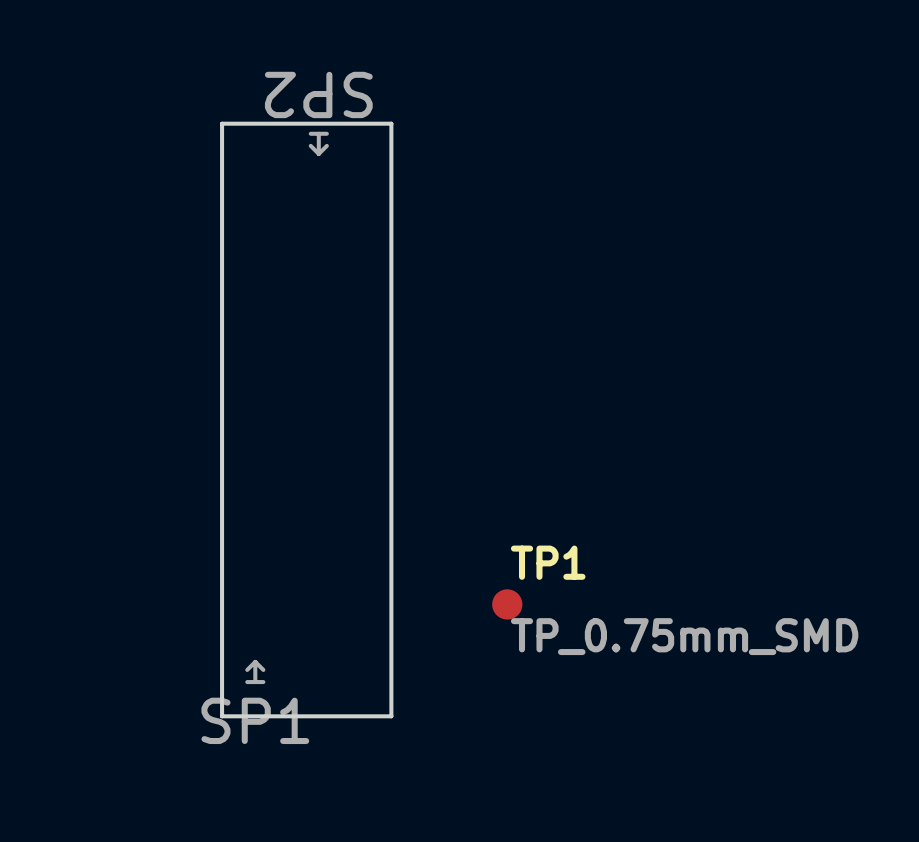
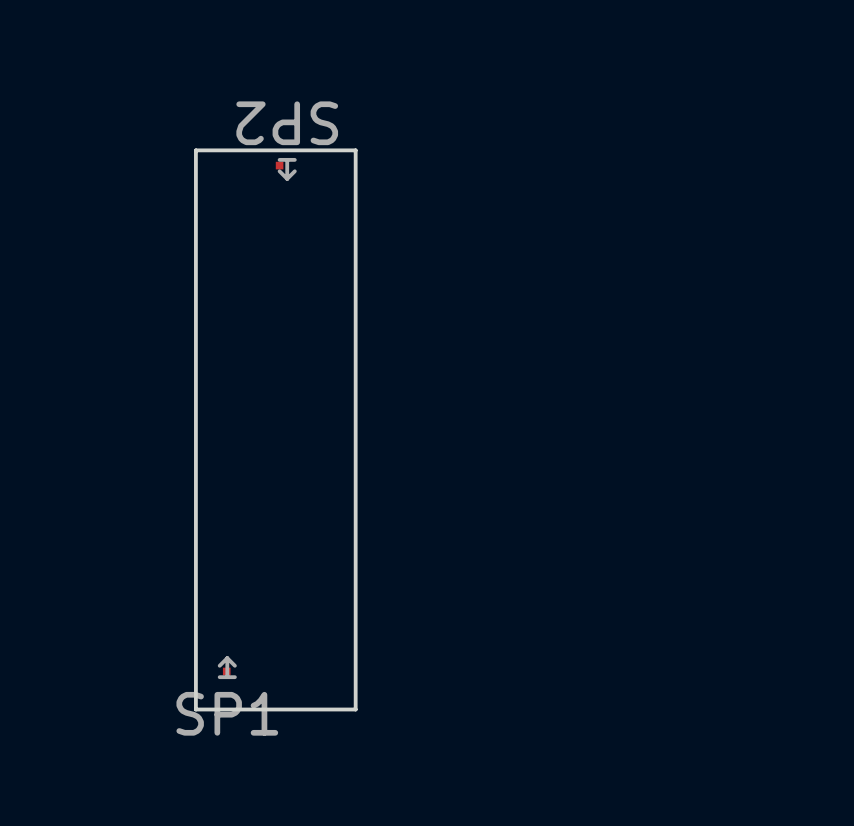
part: none -> (279, 165)
TP1: TP_0.75mm_SMD (507, 604) -> none
part: none -> (226, 671)

